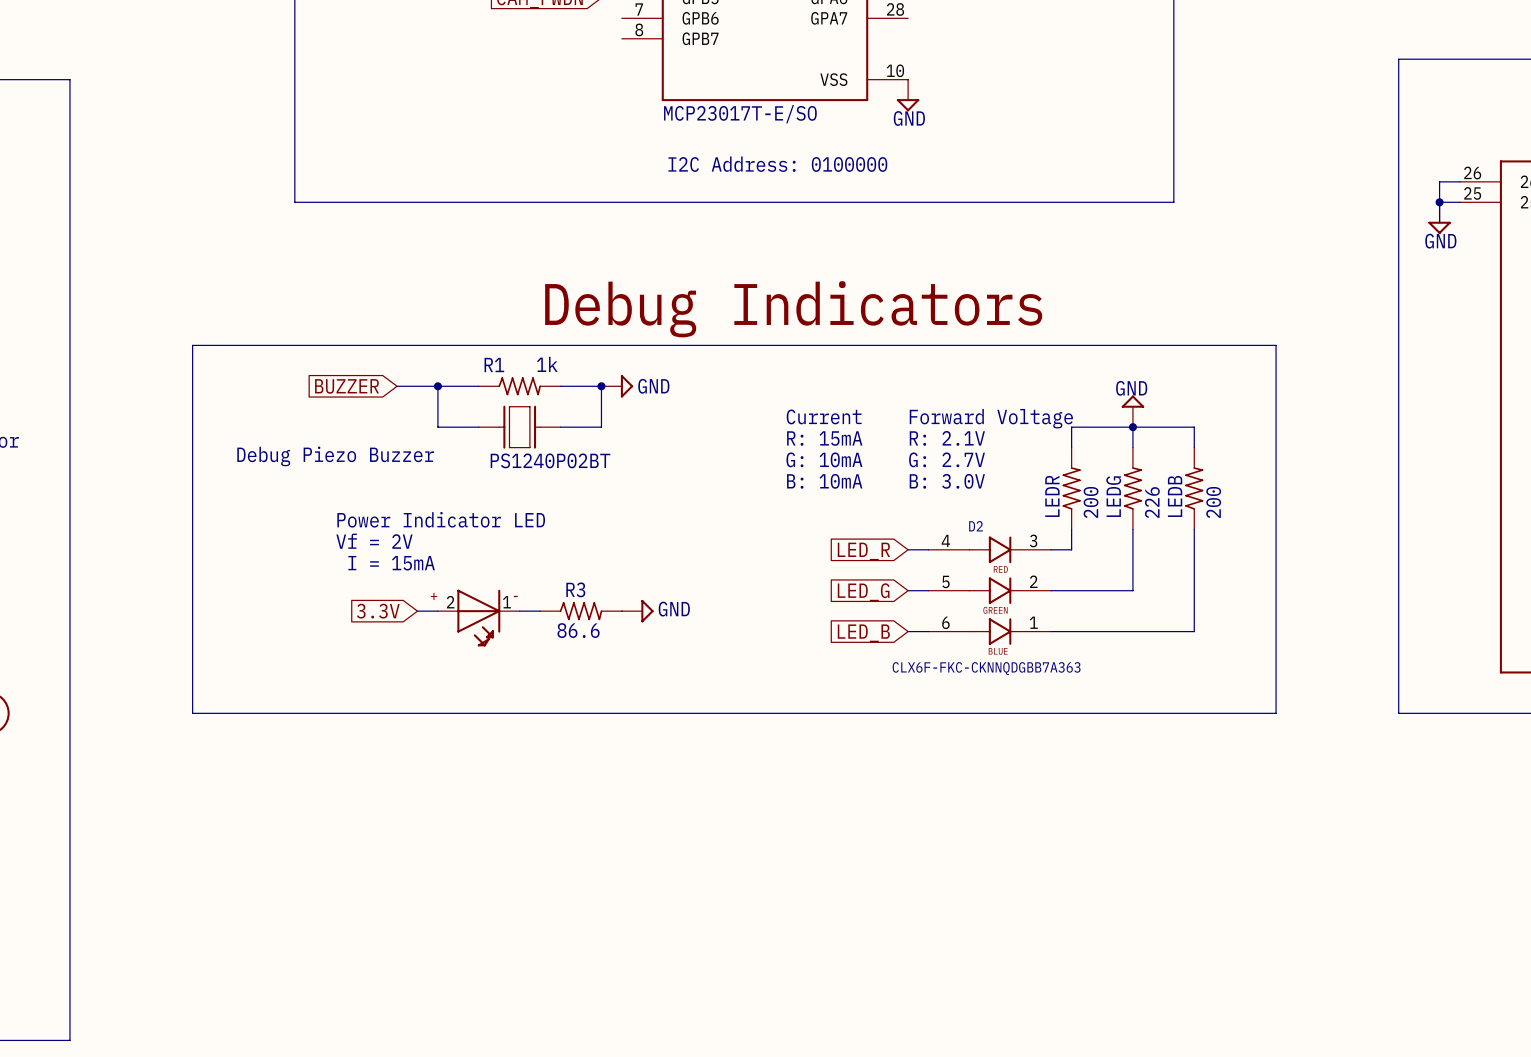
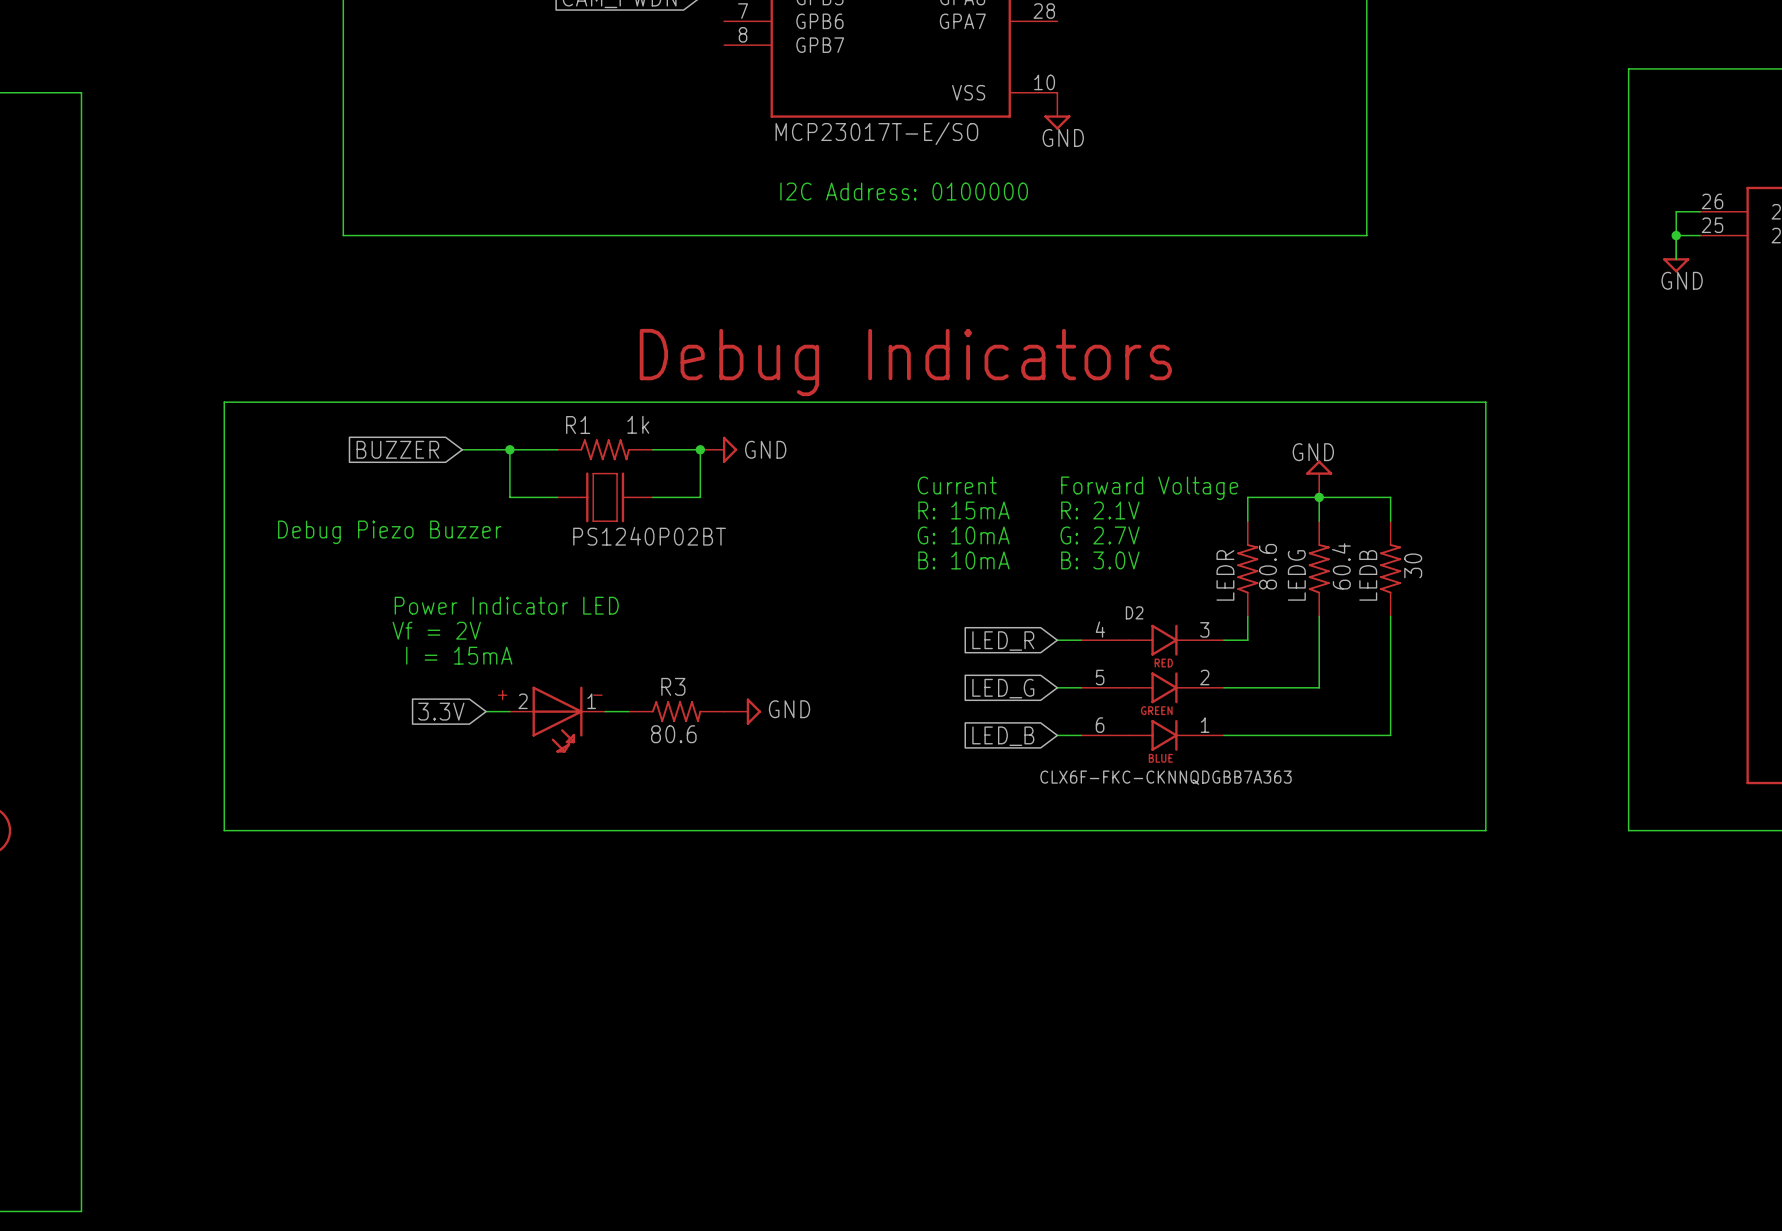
LEDR value: 200 (1091, 502) -> 80.6 (1268, 566)
LEDG value: 226 (1152, 502) -> 60.4 (1341, 566)
LEDB value: 200 (1213, 502) -> 30 (1413, 565)
R3 value: 86.6 (578, 630) -> 80.6 (673, 734)

